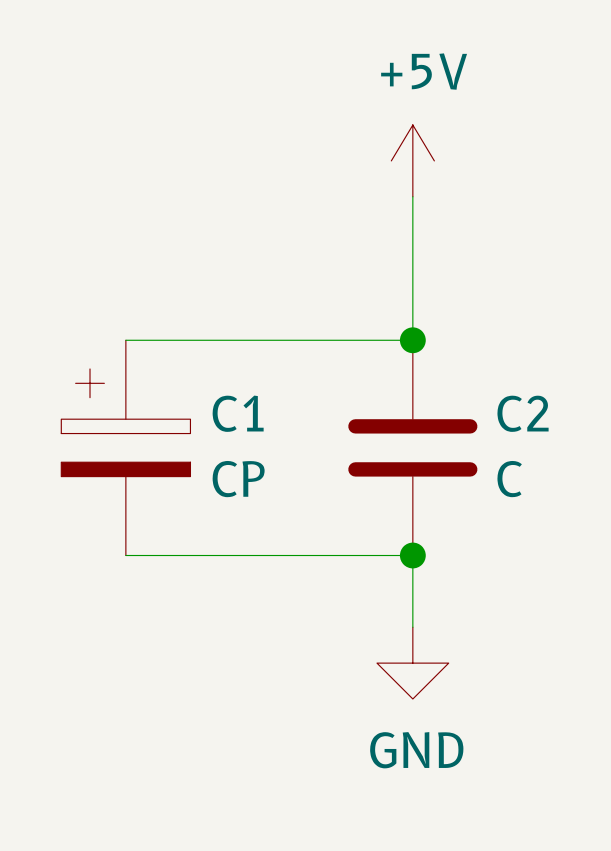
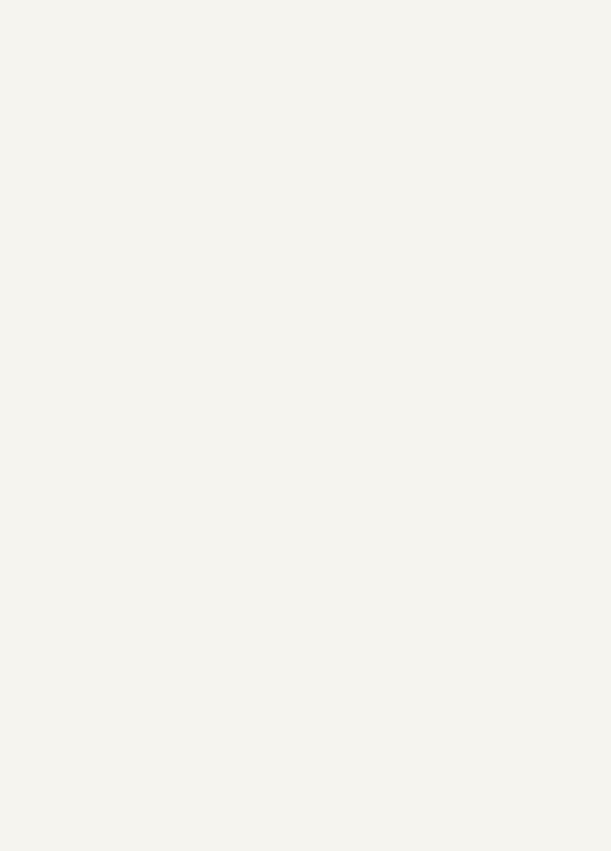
power symbol: +5V (412, 160) -> none
wire: (412, 196) (412, 340) (125, 340) -> none
junction: (412, 340) -> none
C1: CP (125, 447) -> none
C2: C (412, 447) -> none
wire: (125, 555) (412, 555) (412, 627) -> none
junction: (412, 555) -> none
power symbol: GND (412, 663) -> none

